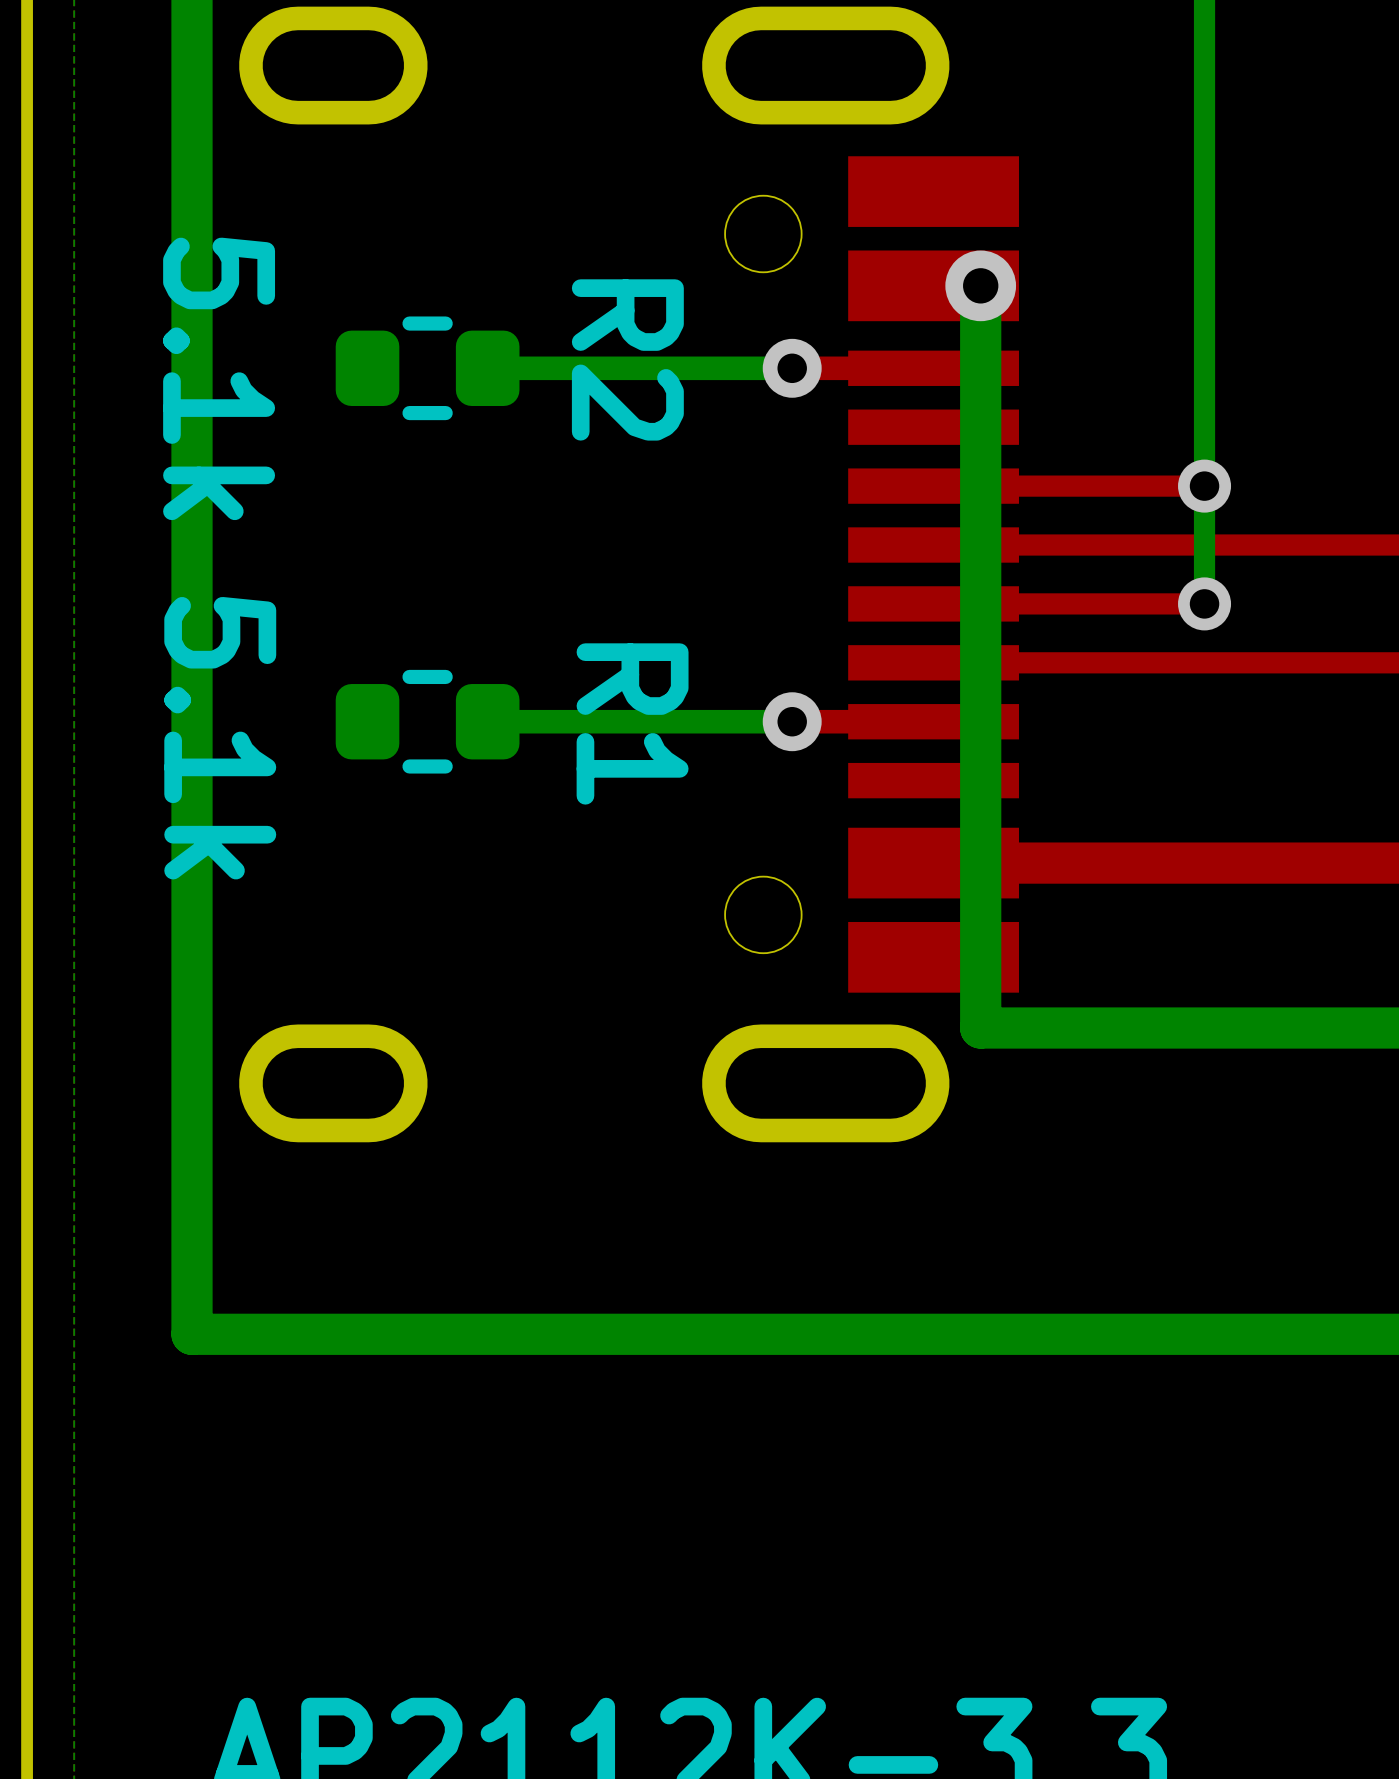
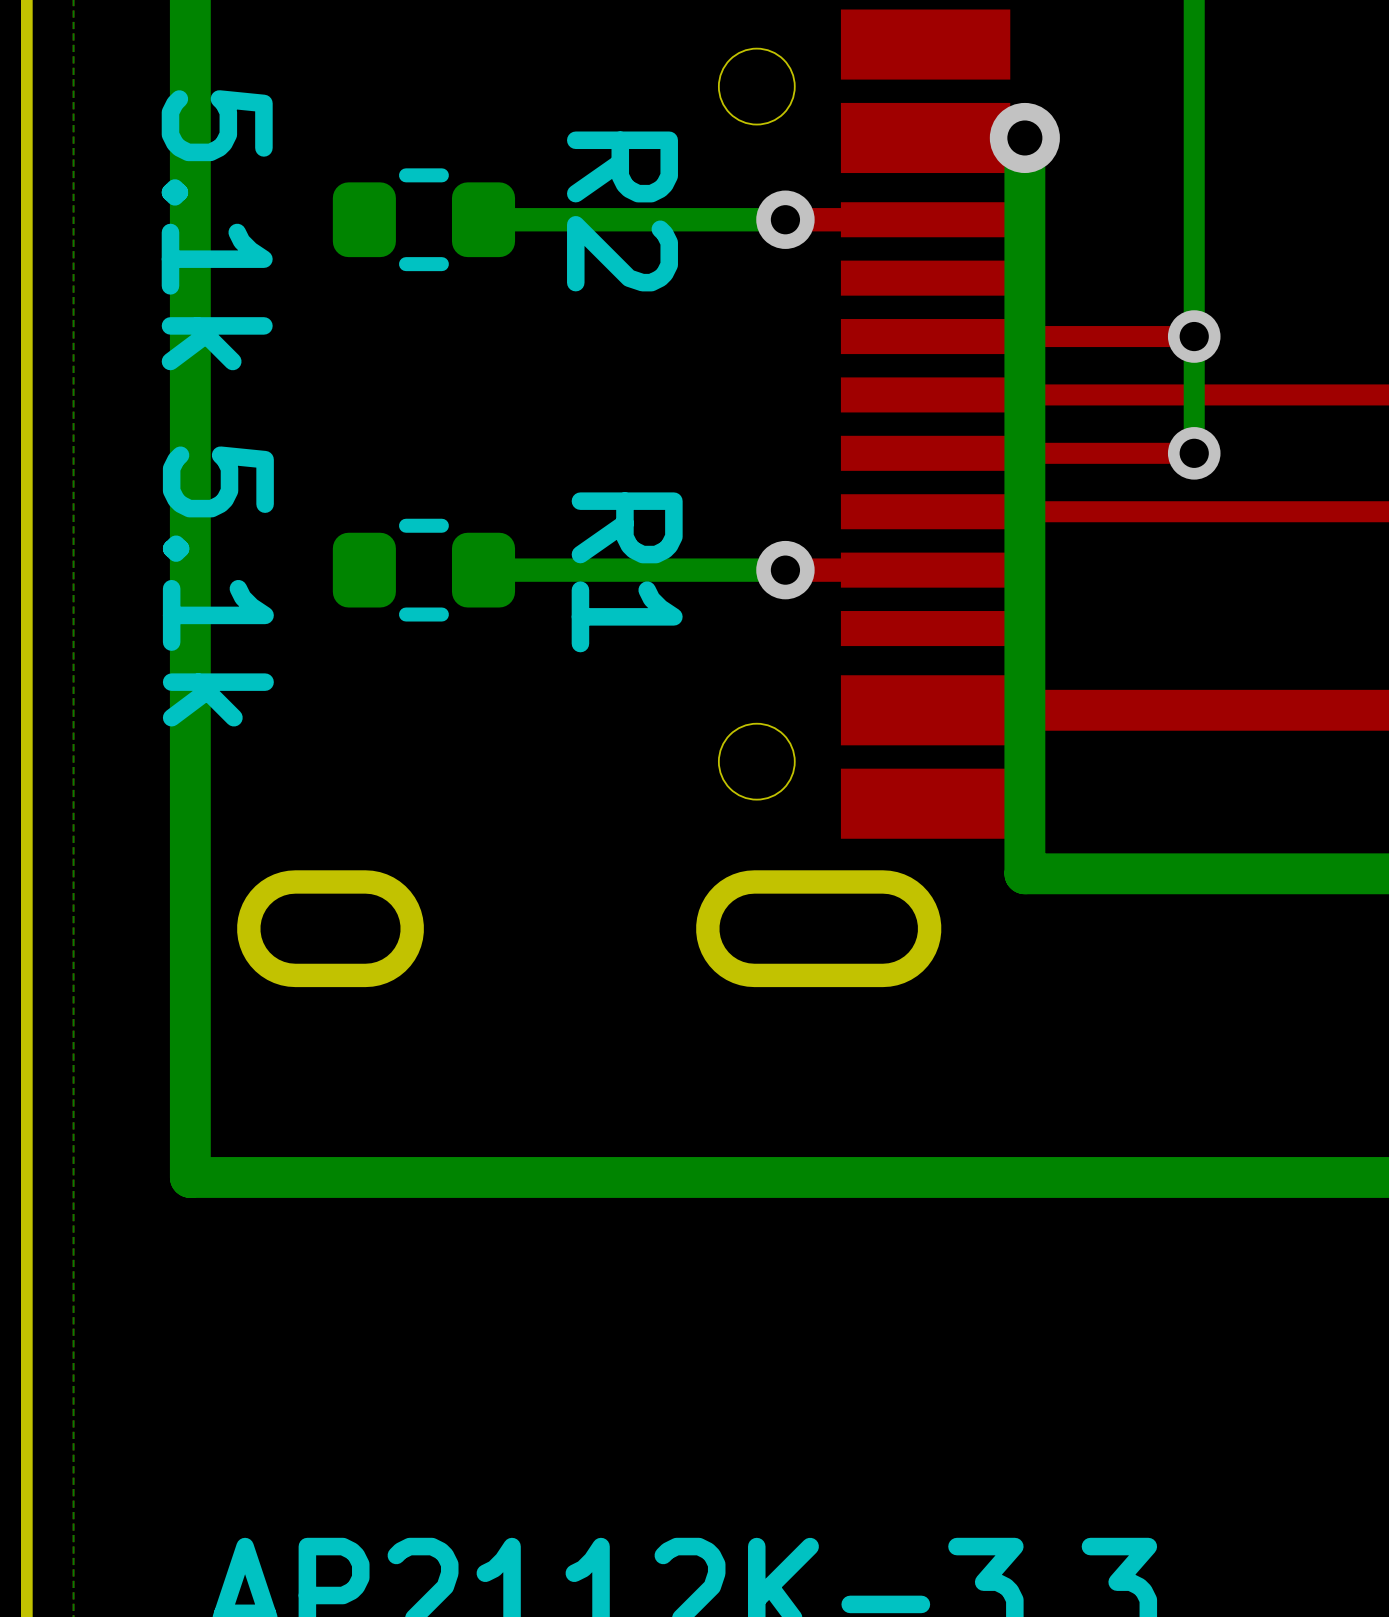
bottom track: (980, 285) (980, 1028) (1033, 1028) -> (1024, 137) (1024, 873)
via position: (980, 285) -> (1024, 137)

